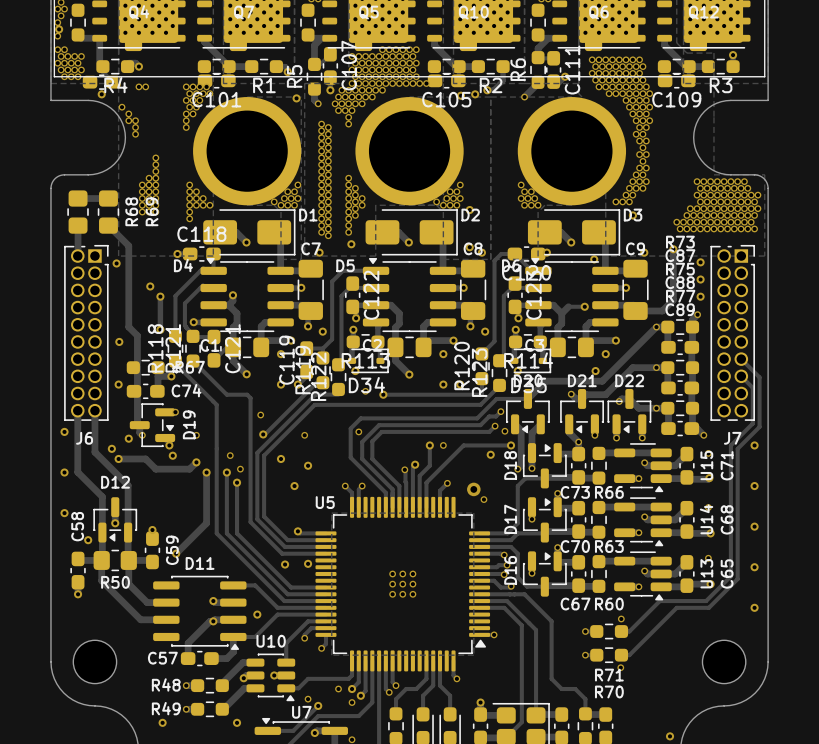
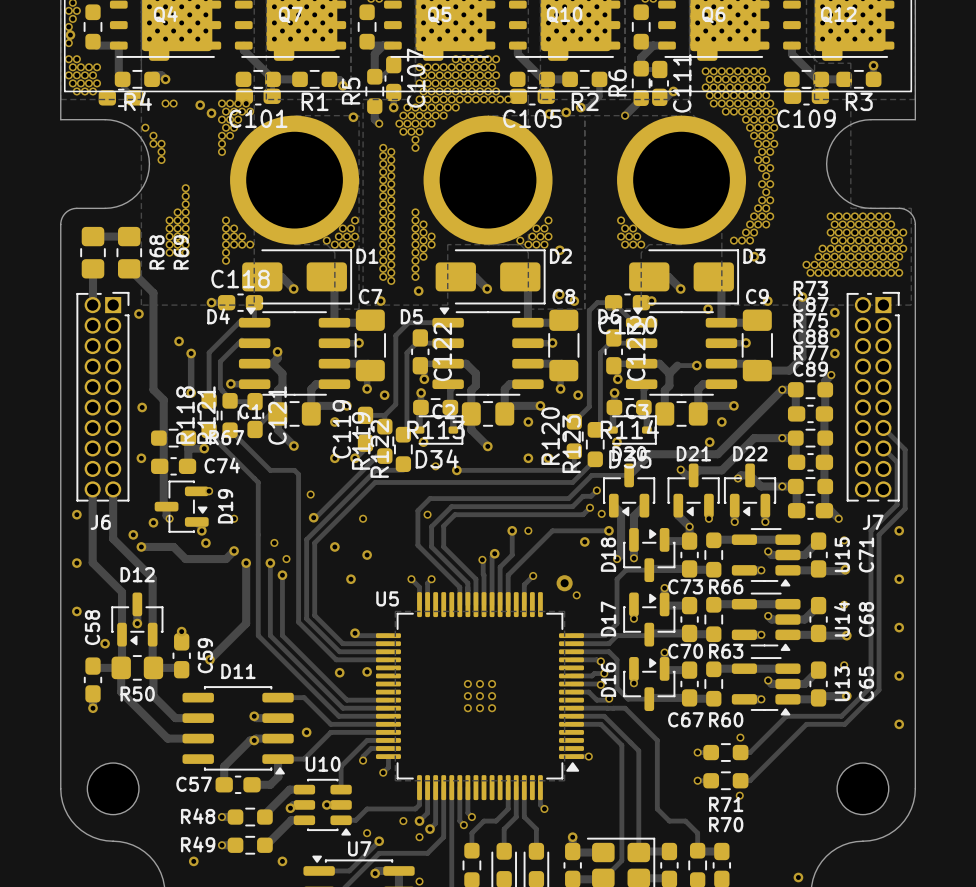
via: none -> (200, 105)
via: (101, 94) -> none
via: none -> (211, 113)

